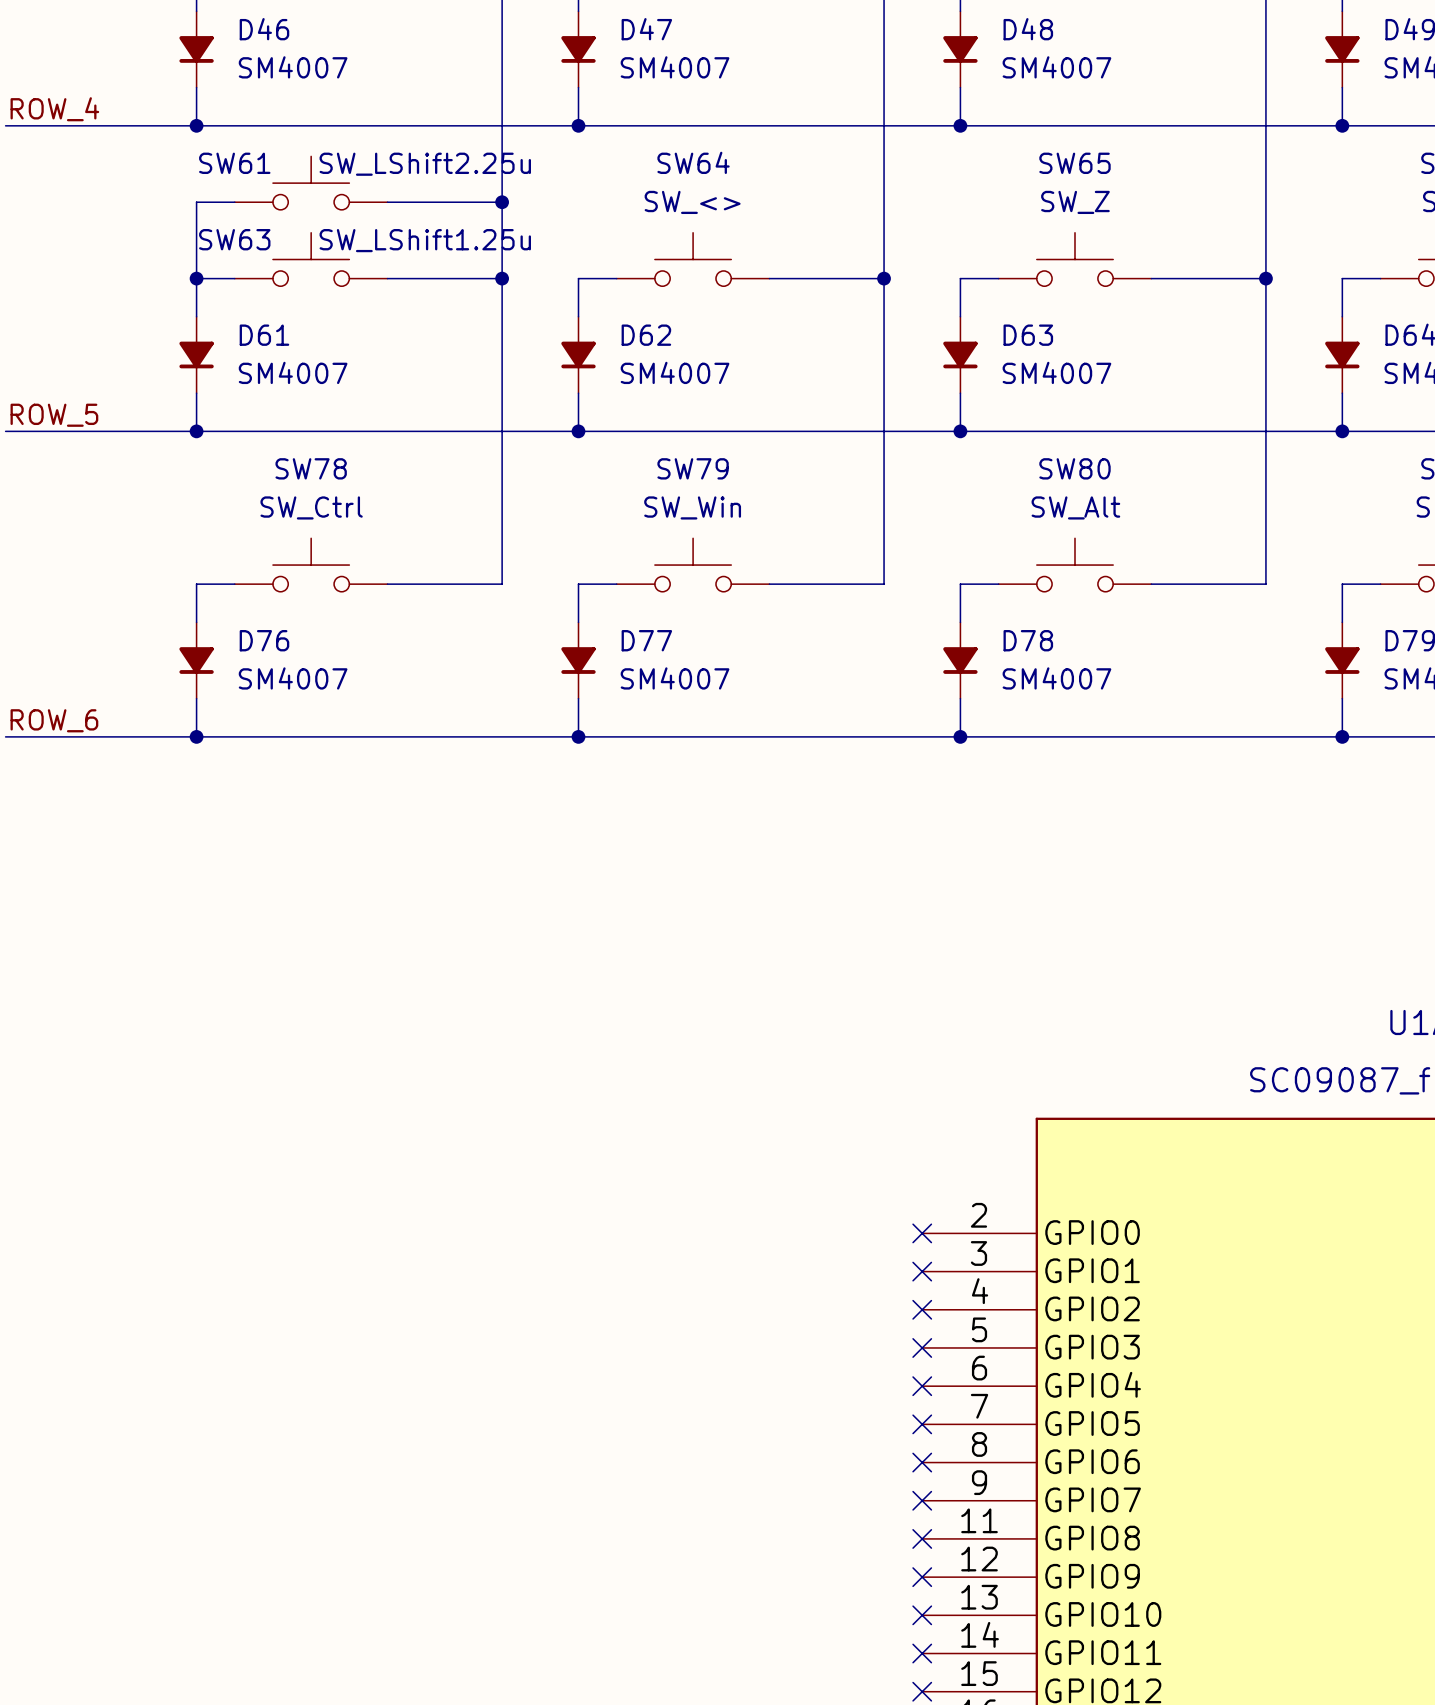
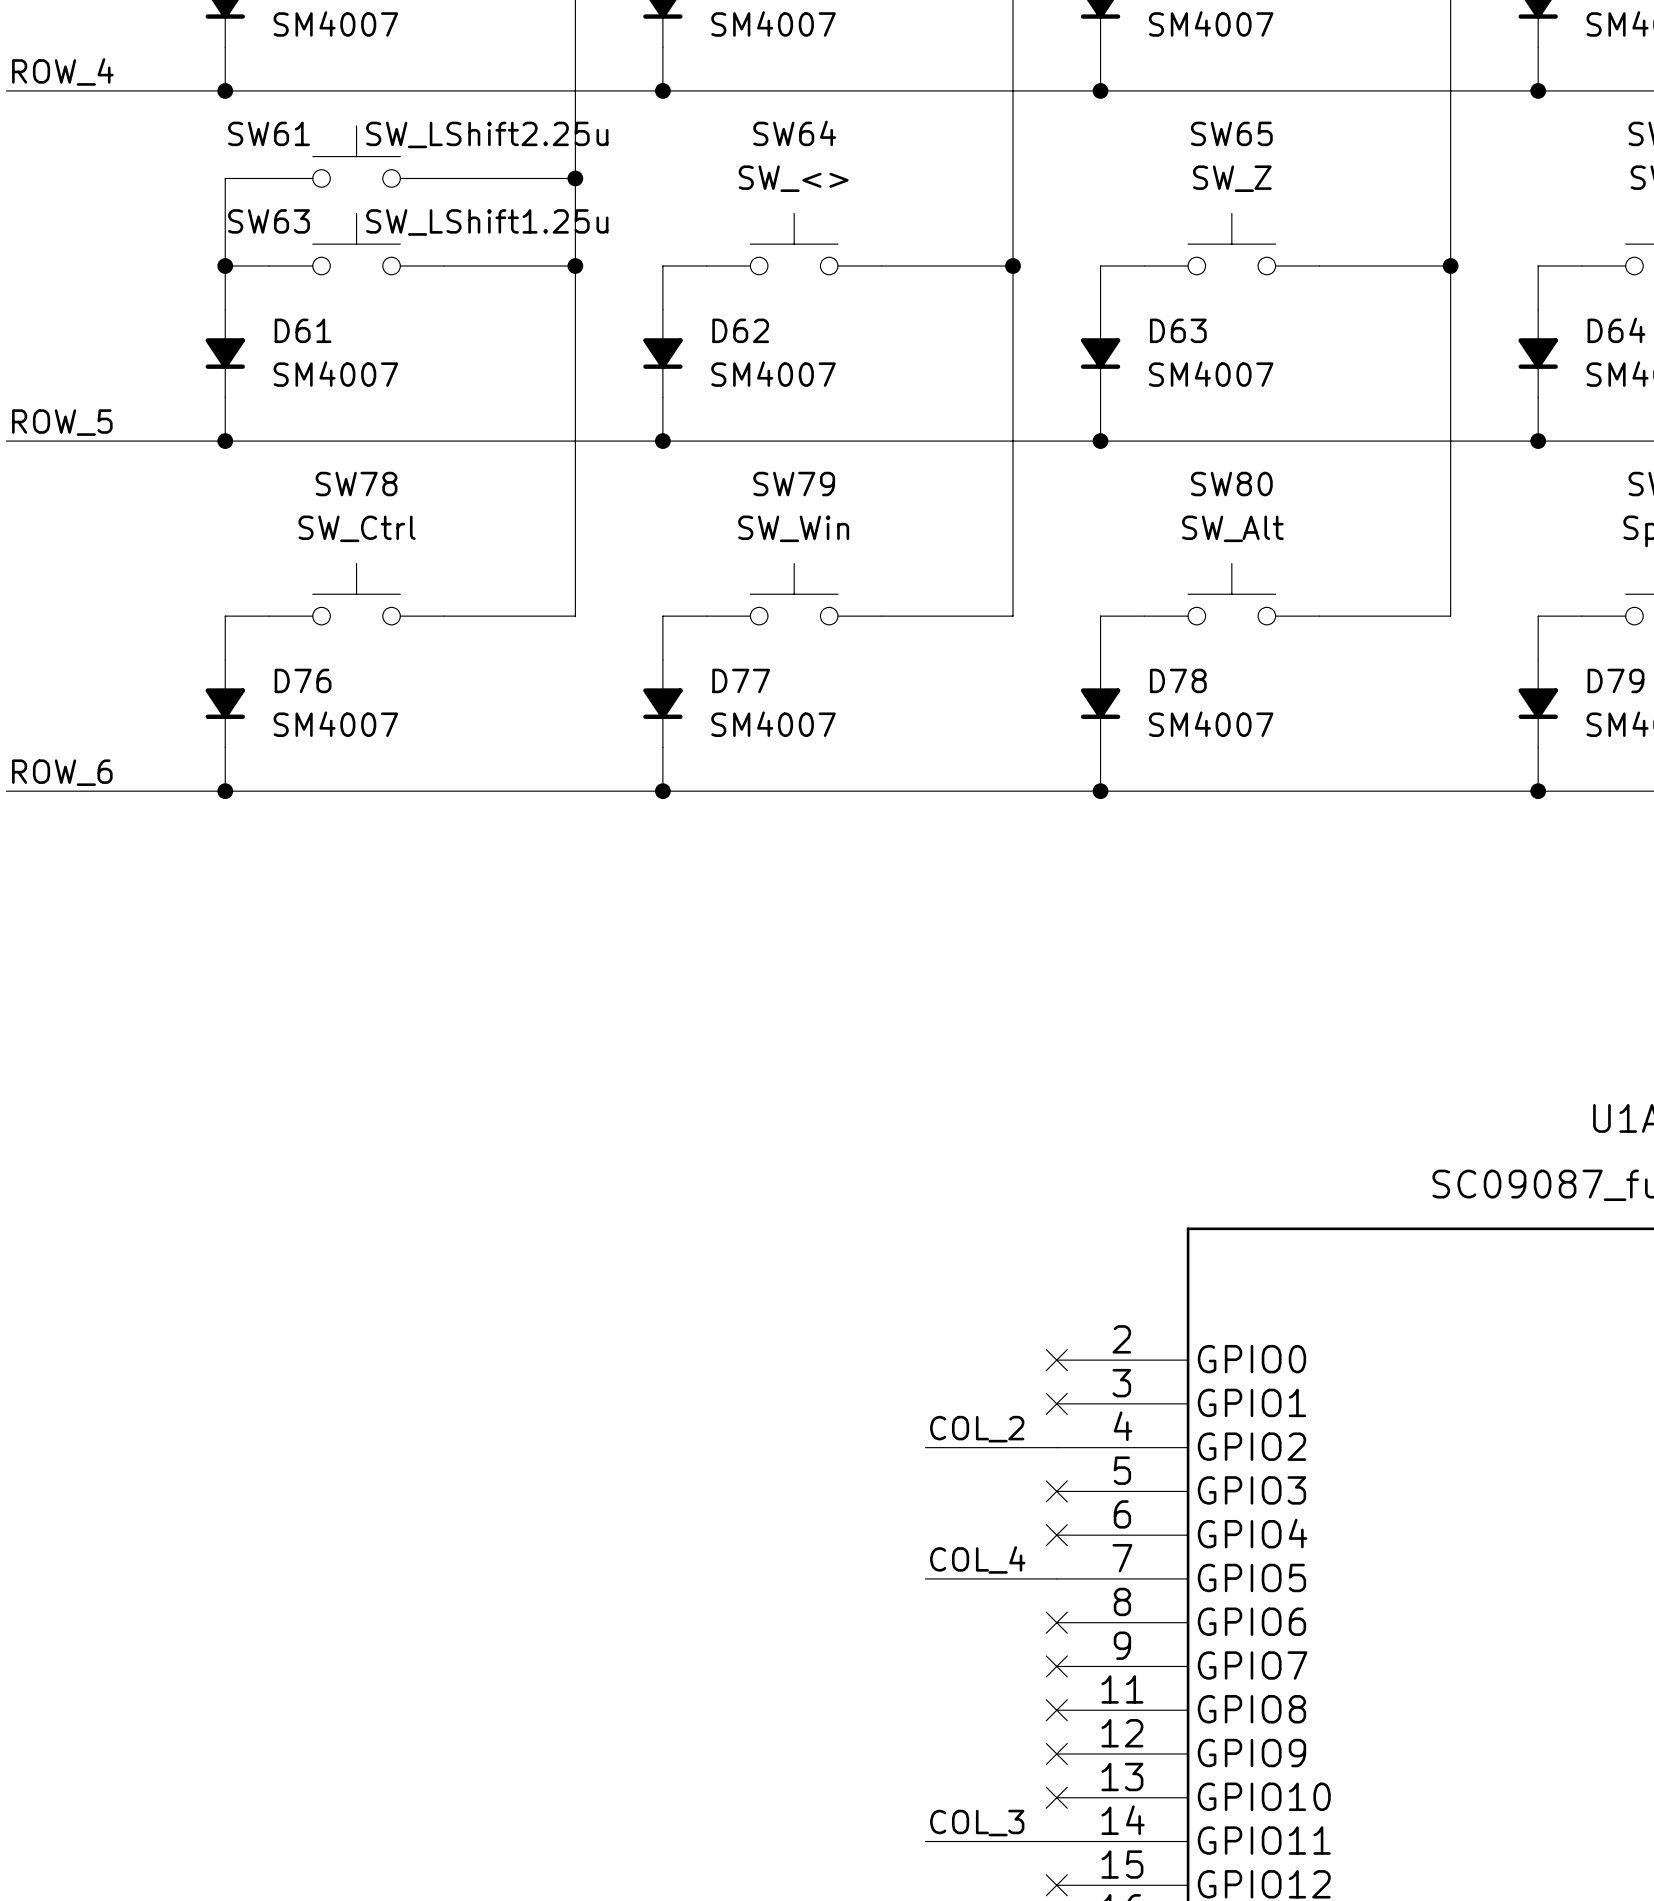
label: none -> COL_2 (977, 1429)
wire: none -> (925, 1447) (1056, 1447)
no-connect mark: (922, 1309) -> none
label: none -> COL_4 (977, 1559)
wire: none -> (925, 1578) (1056, 1578)
no-connect mark: (922, 1424) -> none
label: none -> COL_3 (977, 1823)
wire: none -> (925, 1841) (1056, 1841)
no-connect mark: (922, 1653) -> none

